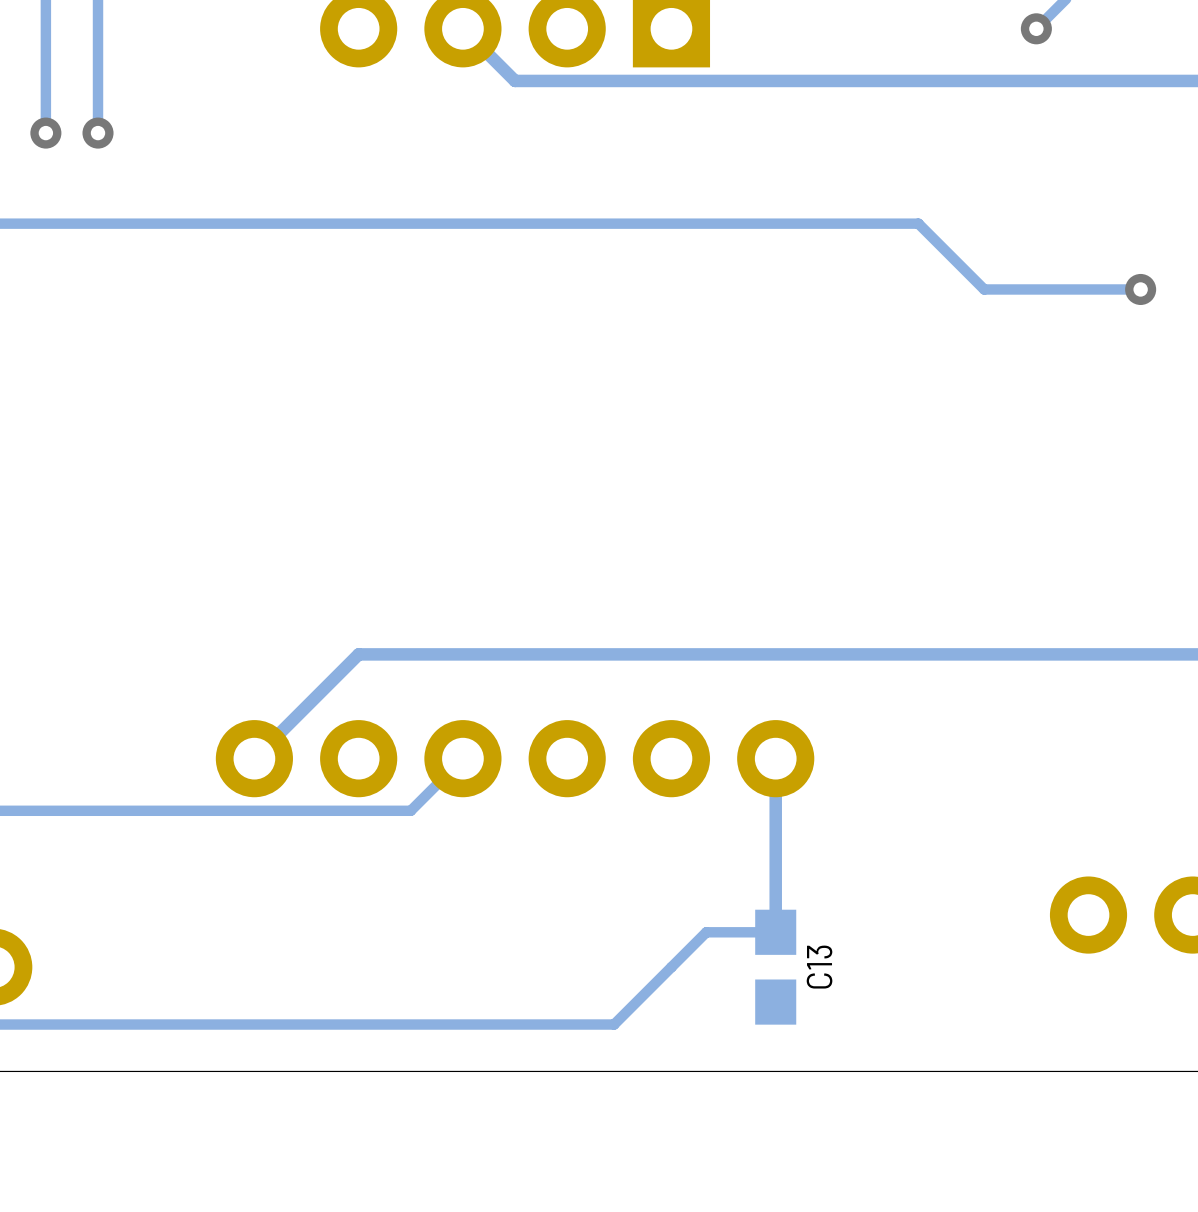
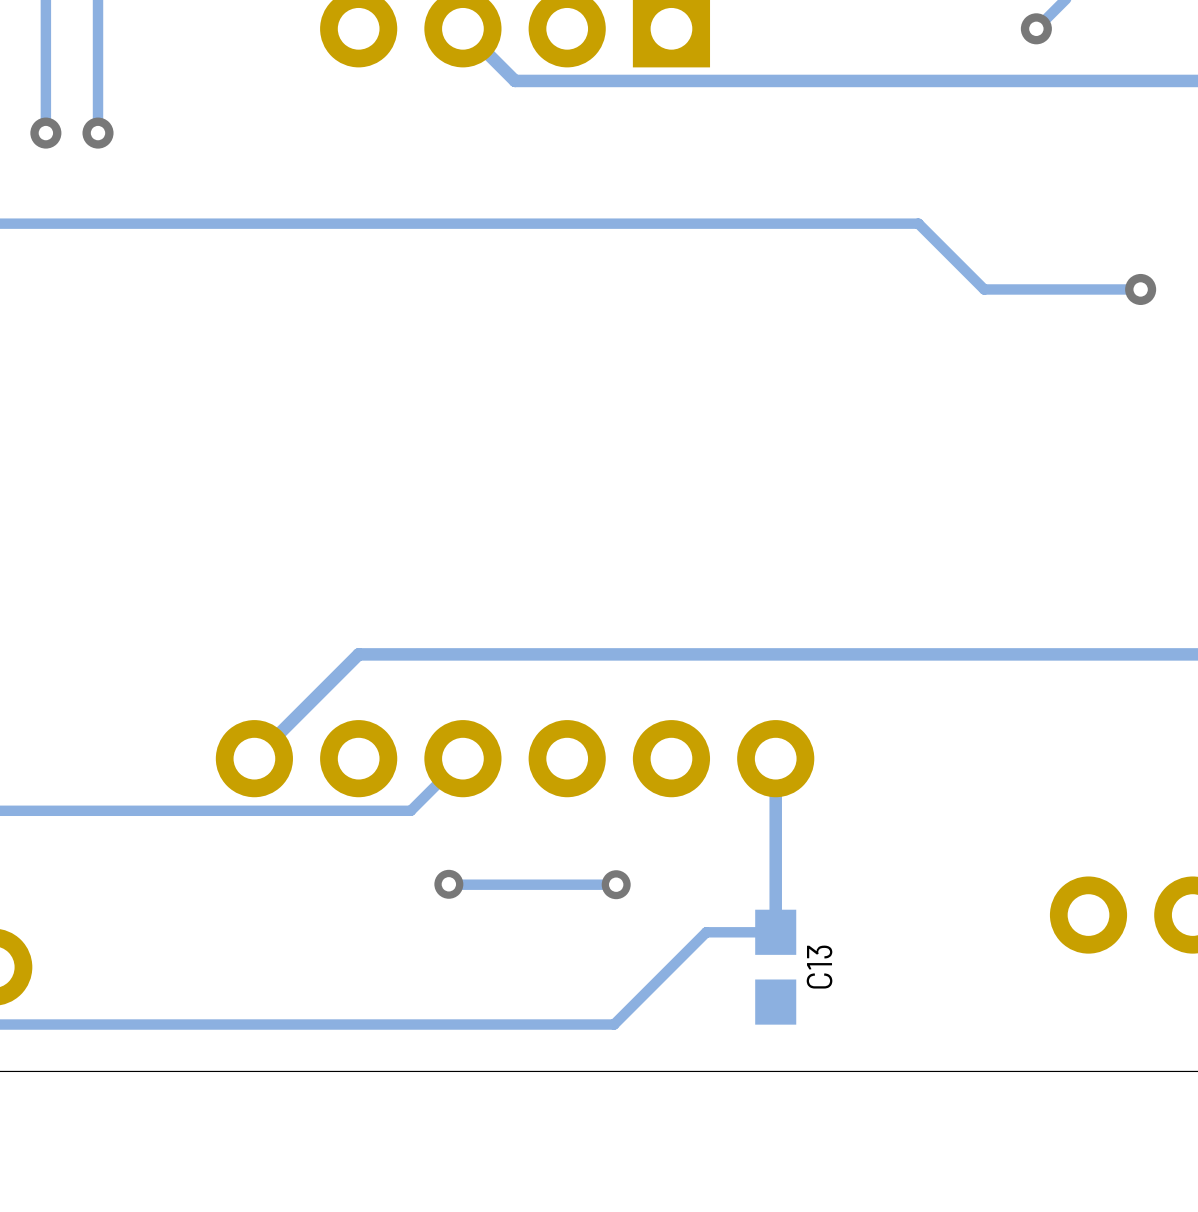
track: none -> (448, 884) (450, 882) (452, 884) (616, 884)
via: none -> (448, 884)
via: none -> (616, 884)

